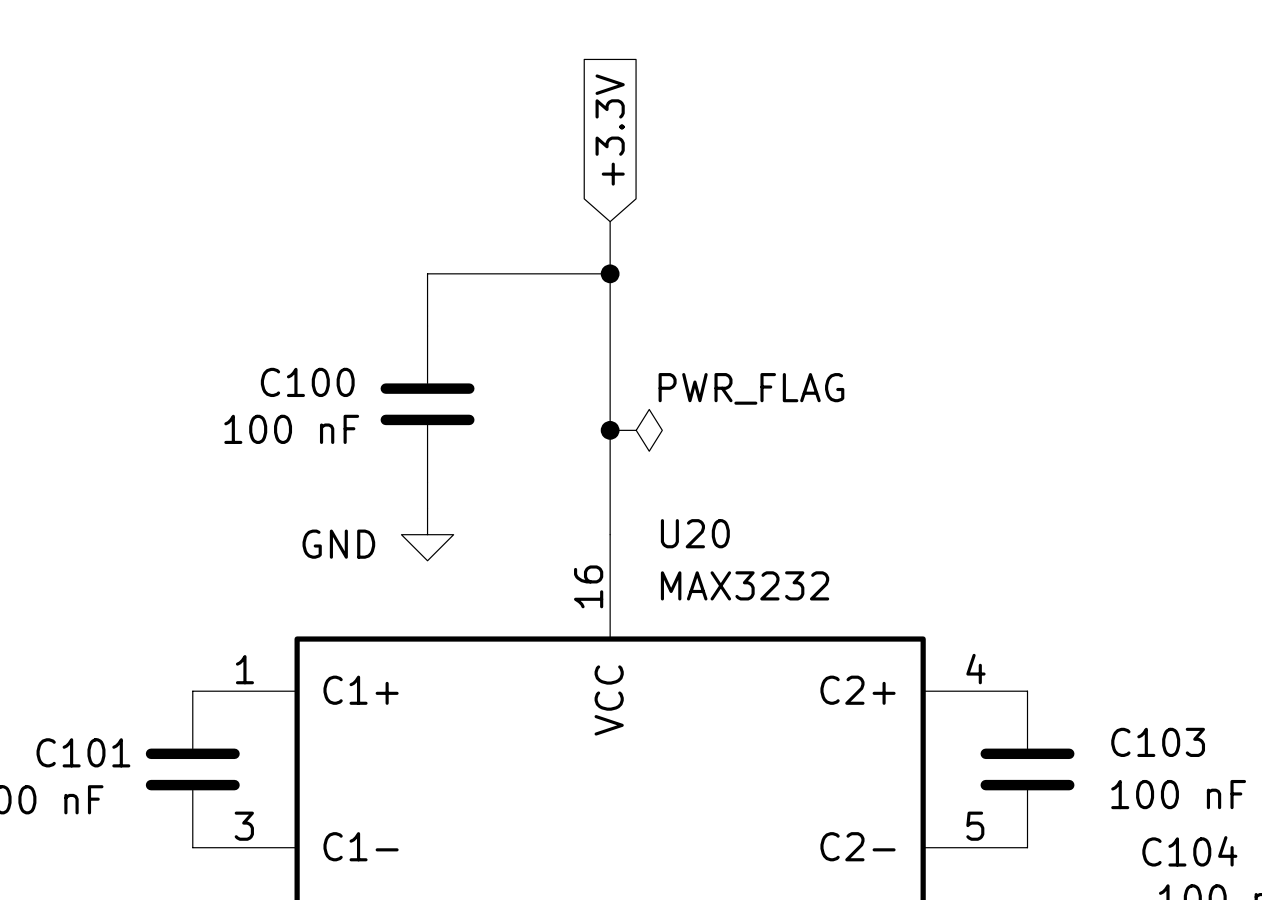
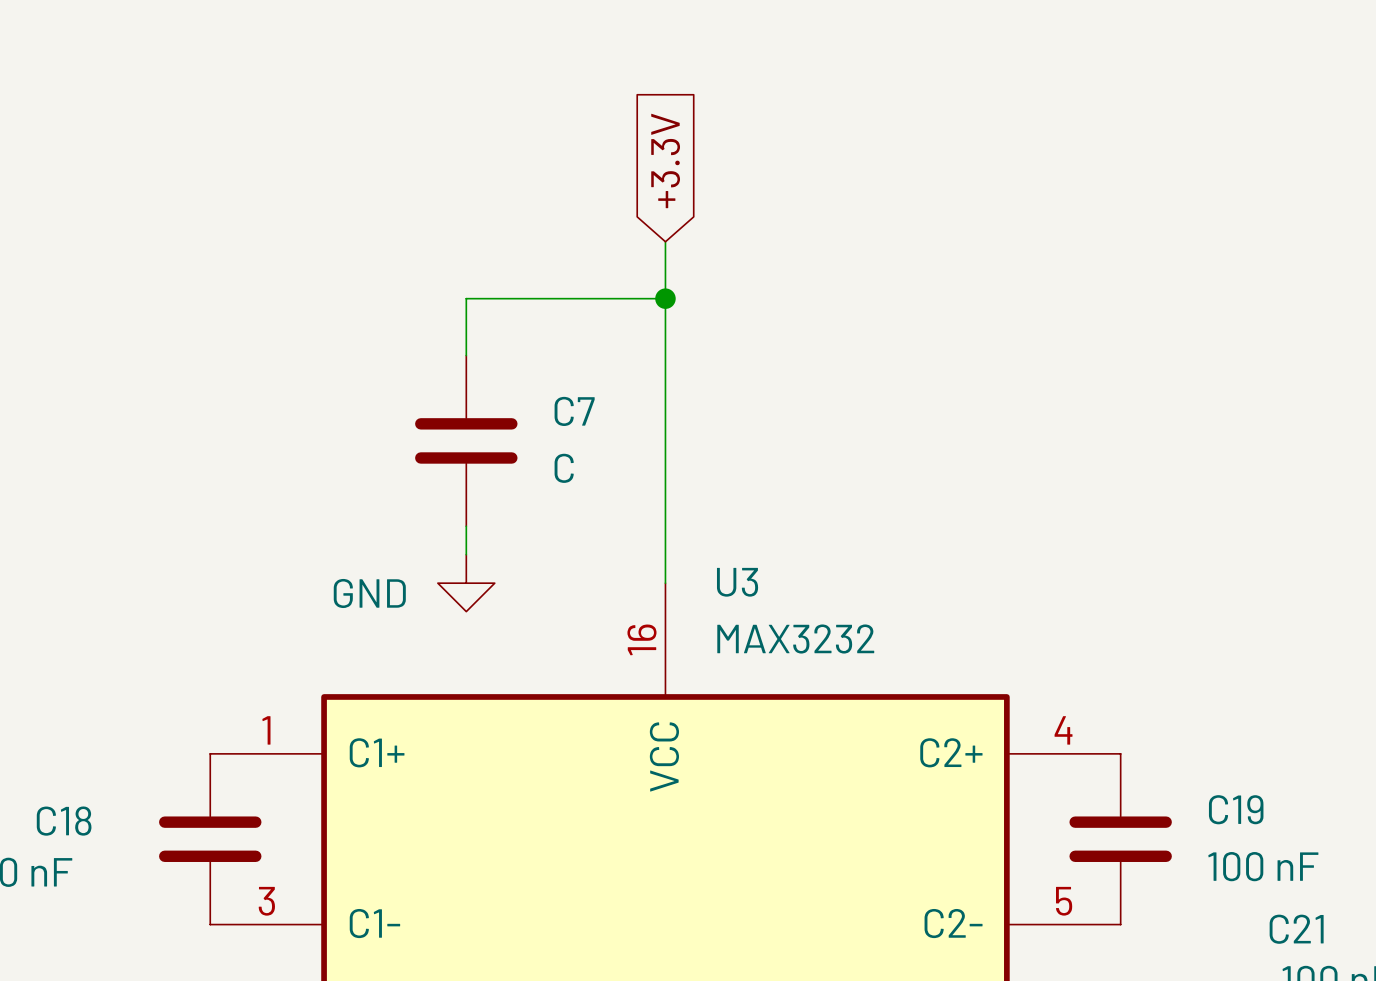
C100 name: C100 (307, 382) -> C7 (574, 411)
C100 value: 100 nF (291, 429) -> C (564, 468)
junction: (610, 430) -> none
power symbol: PWR_FLAG (636, 430) -> none
U20 name: U20 (695, 533) -> U3 (737, 582)
C103 name: C103 (1158, 742) -> C19 (1236, 809)
C101 name: C101 (83, 752) -> C18 (64, 821)
C104 name: C104 (1189, 851) -> C21 (1296, 929)

